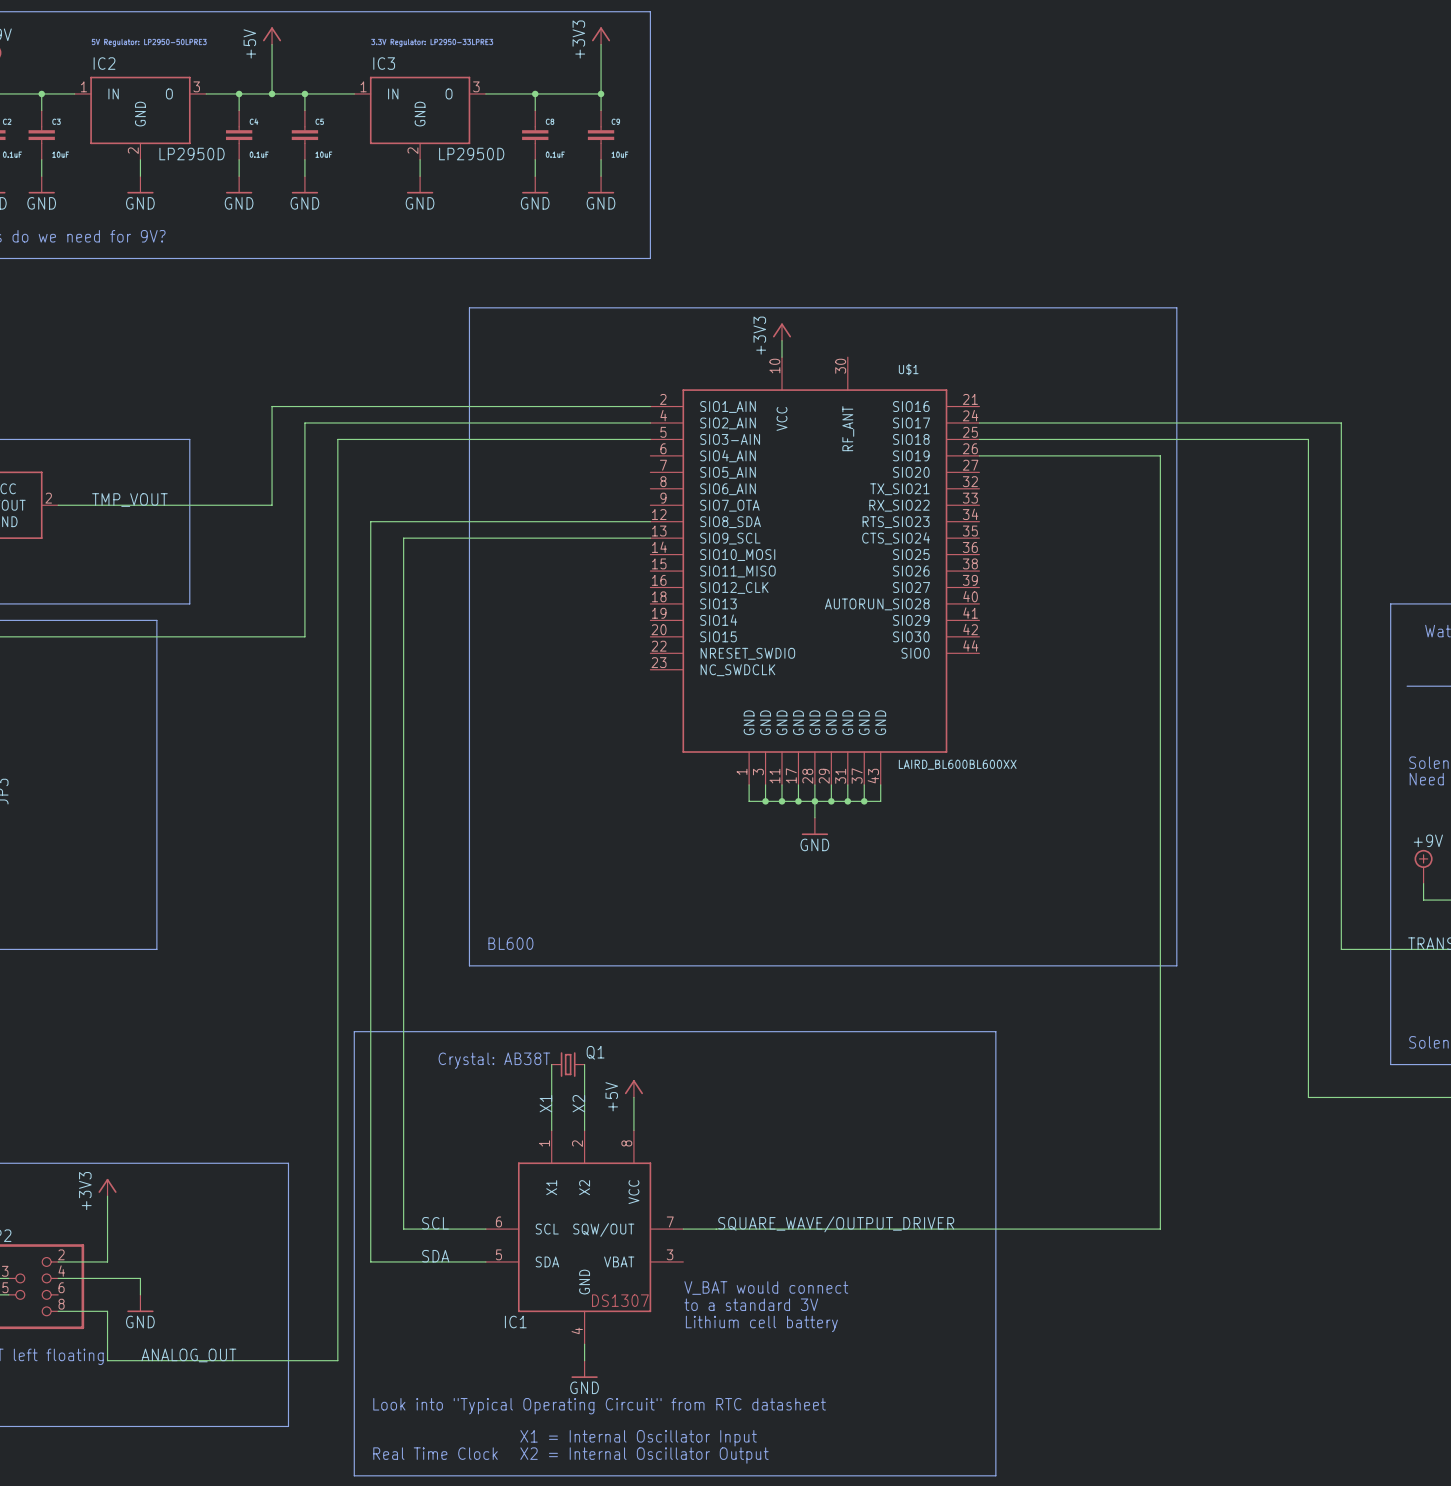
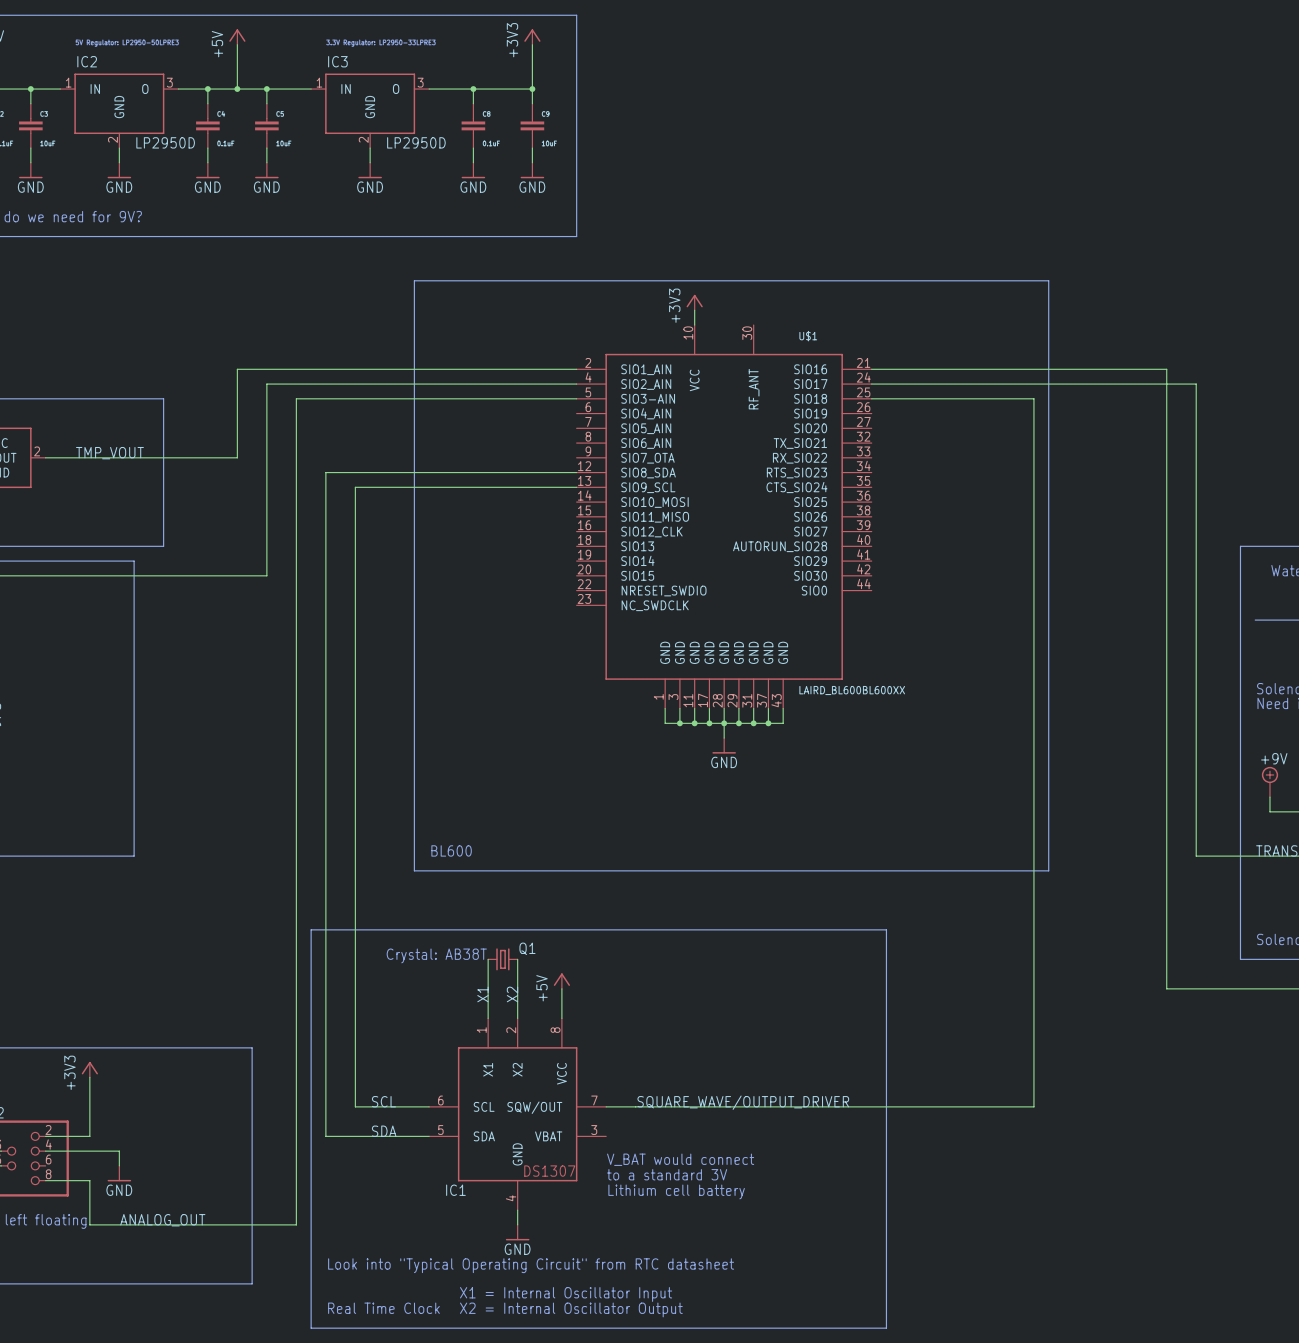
wire: none -> (871, 369) (1166, 369) (1166, 398)
wire: (1160, 439) (1308, 439) -> (1033, 398) (1033, 413)
wire: (979, 455) (1160, 455) -> none

